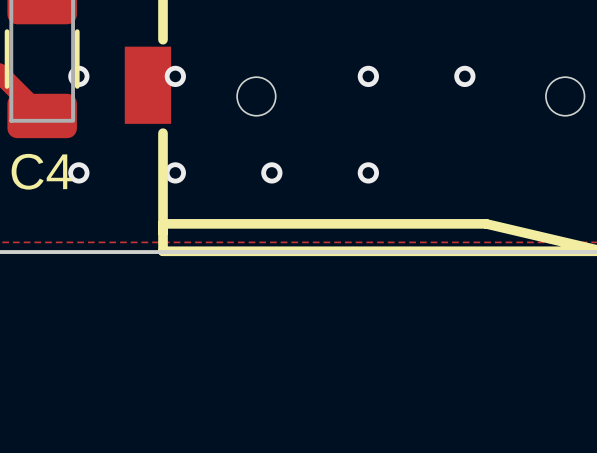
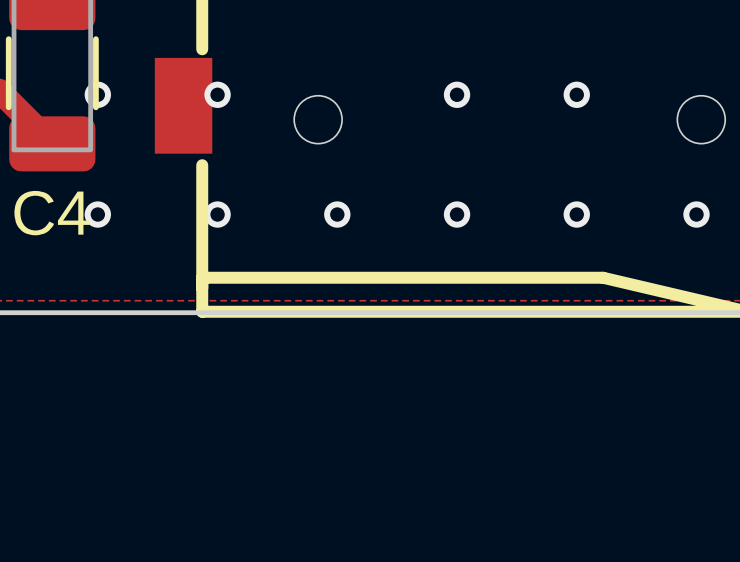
via: none -> (576, 214)
via: none -> (696, 214)

